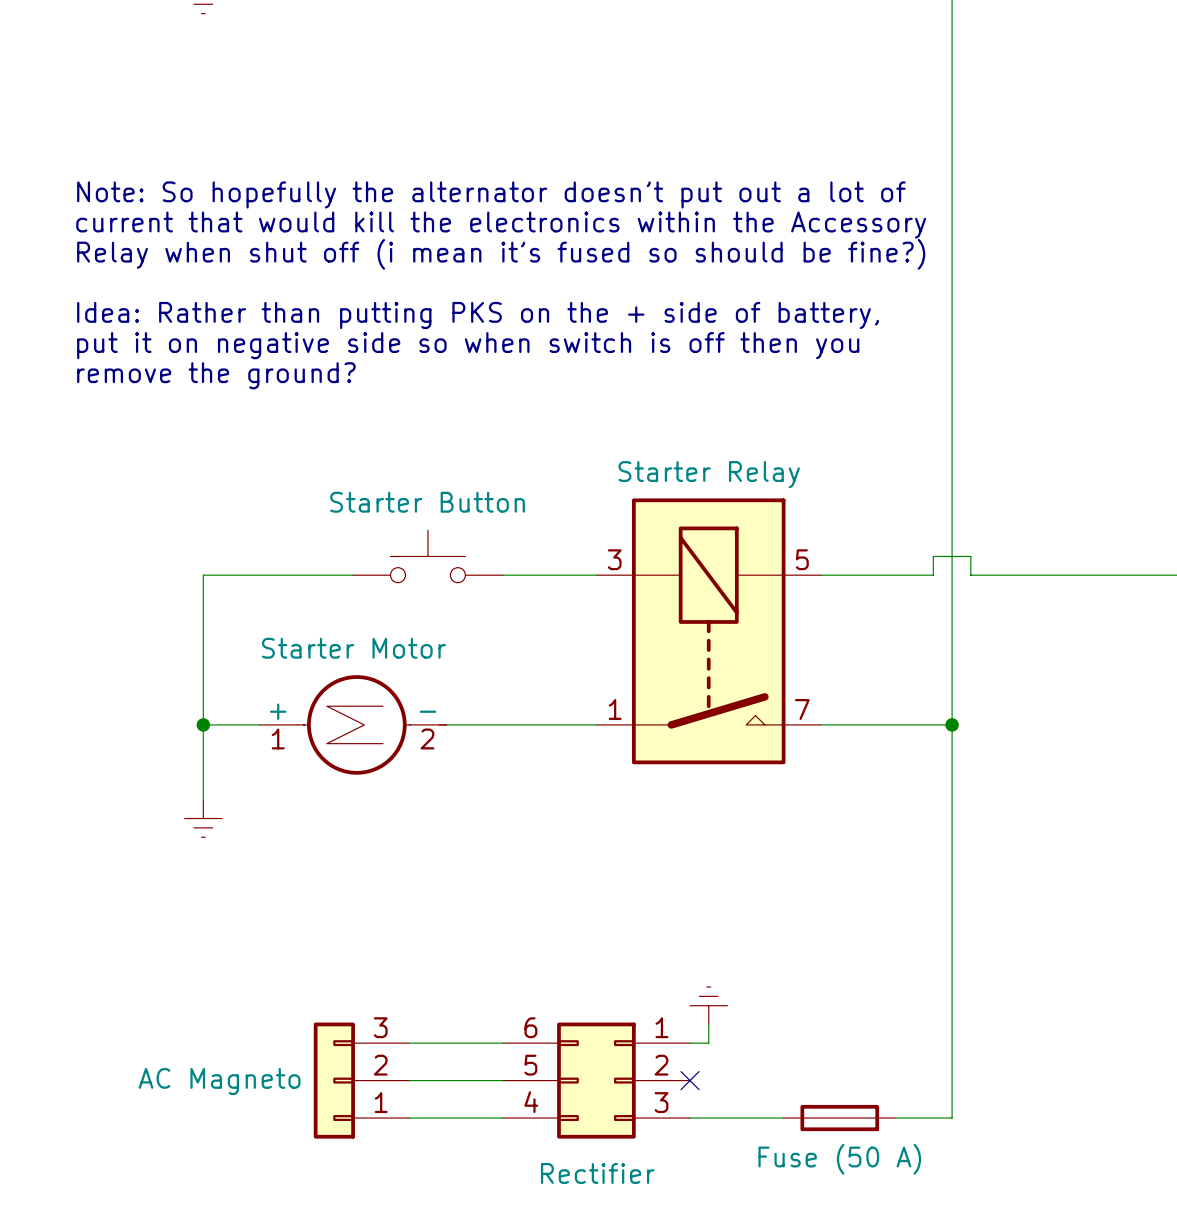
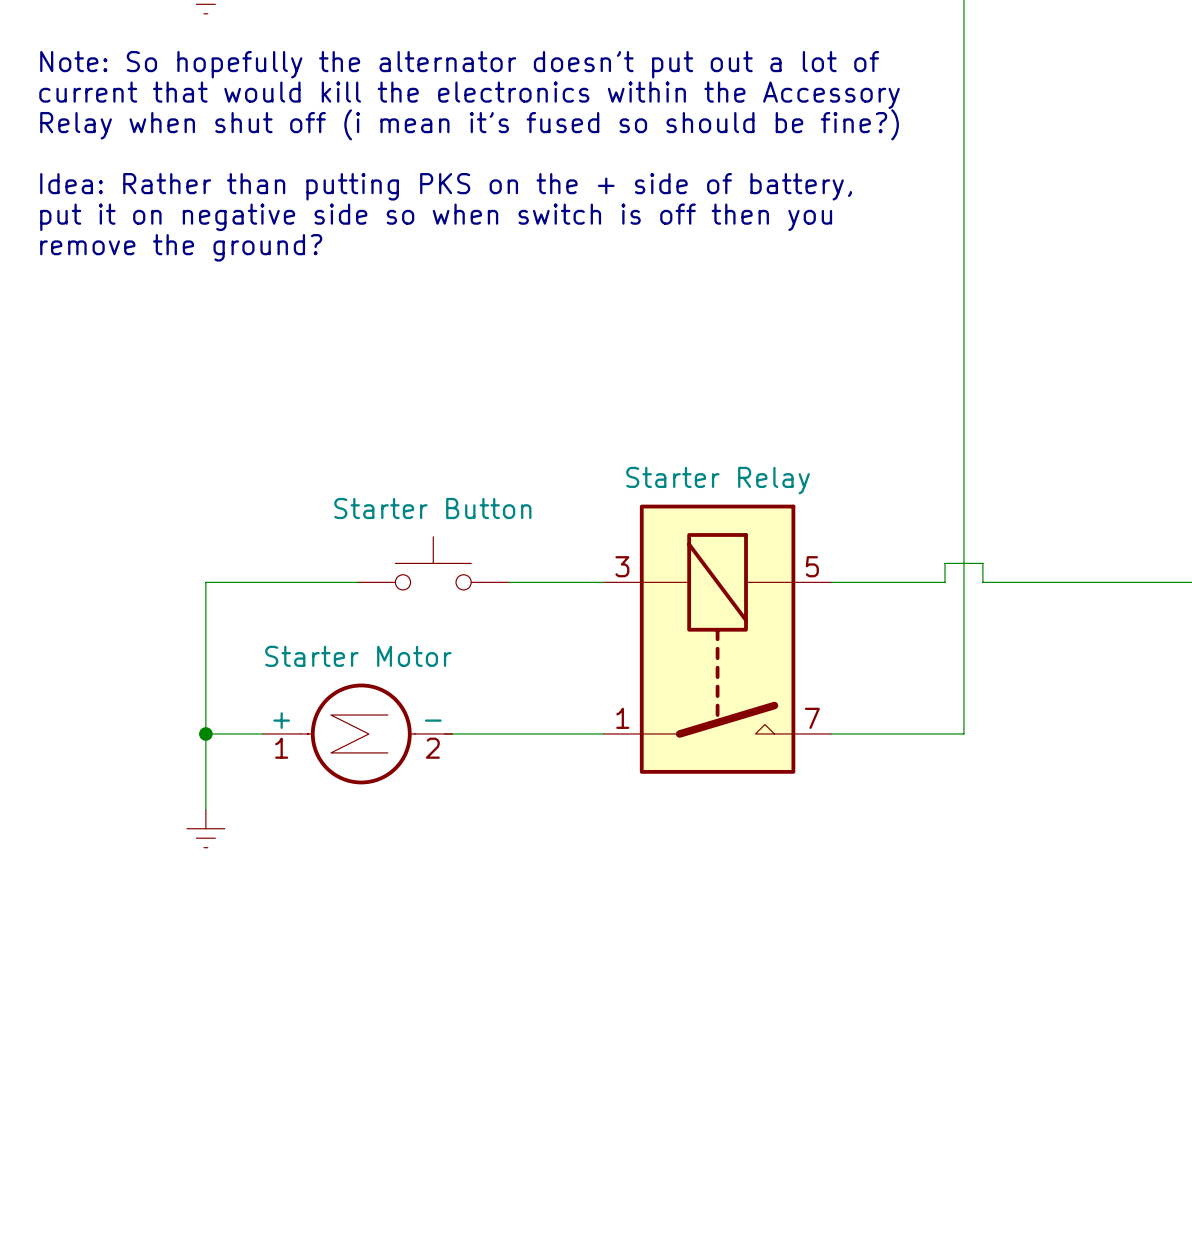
text position: Note: So hopefully the alternator doesn’t put out a lot of (491, 194) -> Note: So hopefully the alternator doesn’t put out a lot of (459, 64)
text position: current that would kill the electronics within the Accessory (501, 225) -> current that would kill the electronics within the Accessory (469, 95)
text position: Relay when shut off (i mean it’s fused so should be fine?) (501, 254) -> Relay when shut off (i mean it’s fused so should be fine?) (469, 124)
text position: Idea: Rather than putting PKS on the + side of battery, (478, 315) -> Idea: Rather than putting PKS on the + side of battery, (446, 186)
text position: put it on negative side so when switch is off then you (468, 345) -> put it on negative side so when switch is off then you (436, 217)
text position: remove the ground? (216, 375) -> remove the ground? (181, 247)
wire: (952, 724) (952, 1118) (895, 1118) -> none
junction: (952, 724) -> none
power symbol: (708, 1005) -> none
wire: (708, 1024) (708, 1043) (690, 1043) -> none
wire: (409, 1043) (502, 1043) -> none
part: AC Magneto (361, 1080) -> none
wire: (409, 1080) (502, 1080) -> none
part: Rectifier (596, 1080) -> none
no-connect mark: (690, 1080) -> none
wire: (409, 1118) (502, 1118) -> none
wire: (690, 1118) (783, 1118) -> none
part: Fuse (50 A) (839, 1118) -> none

